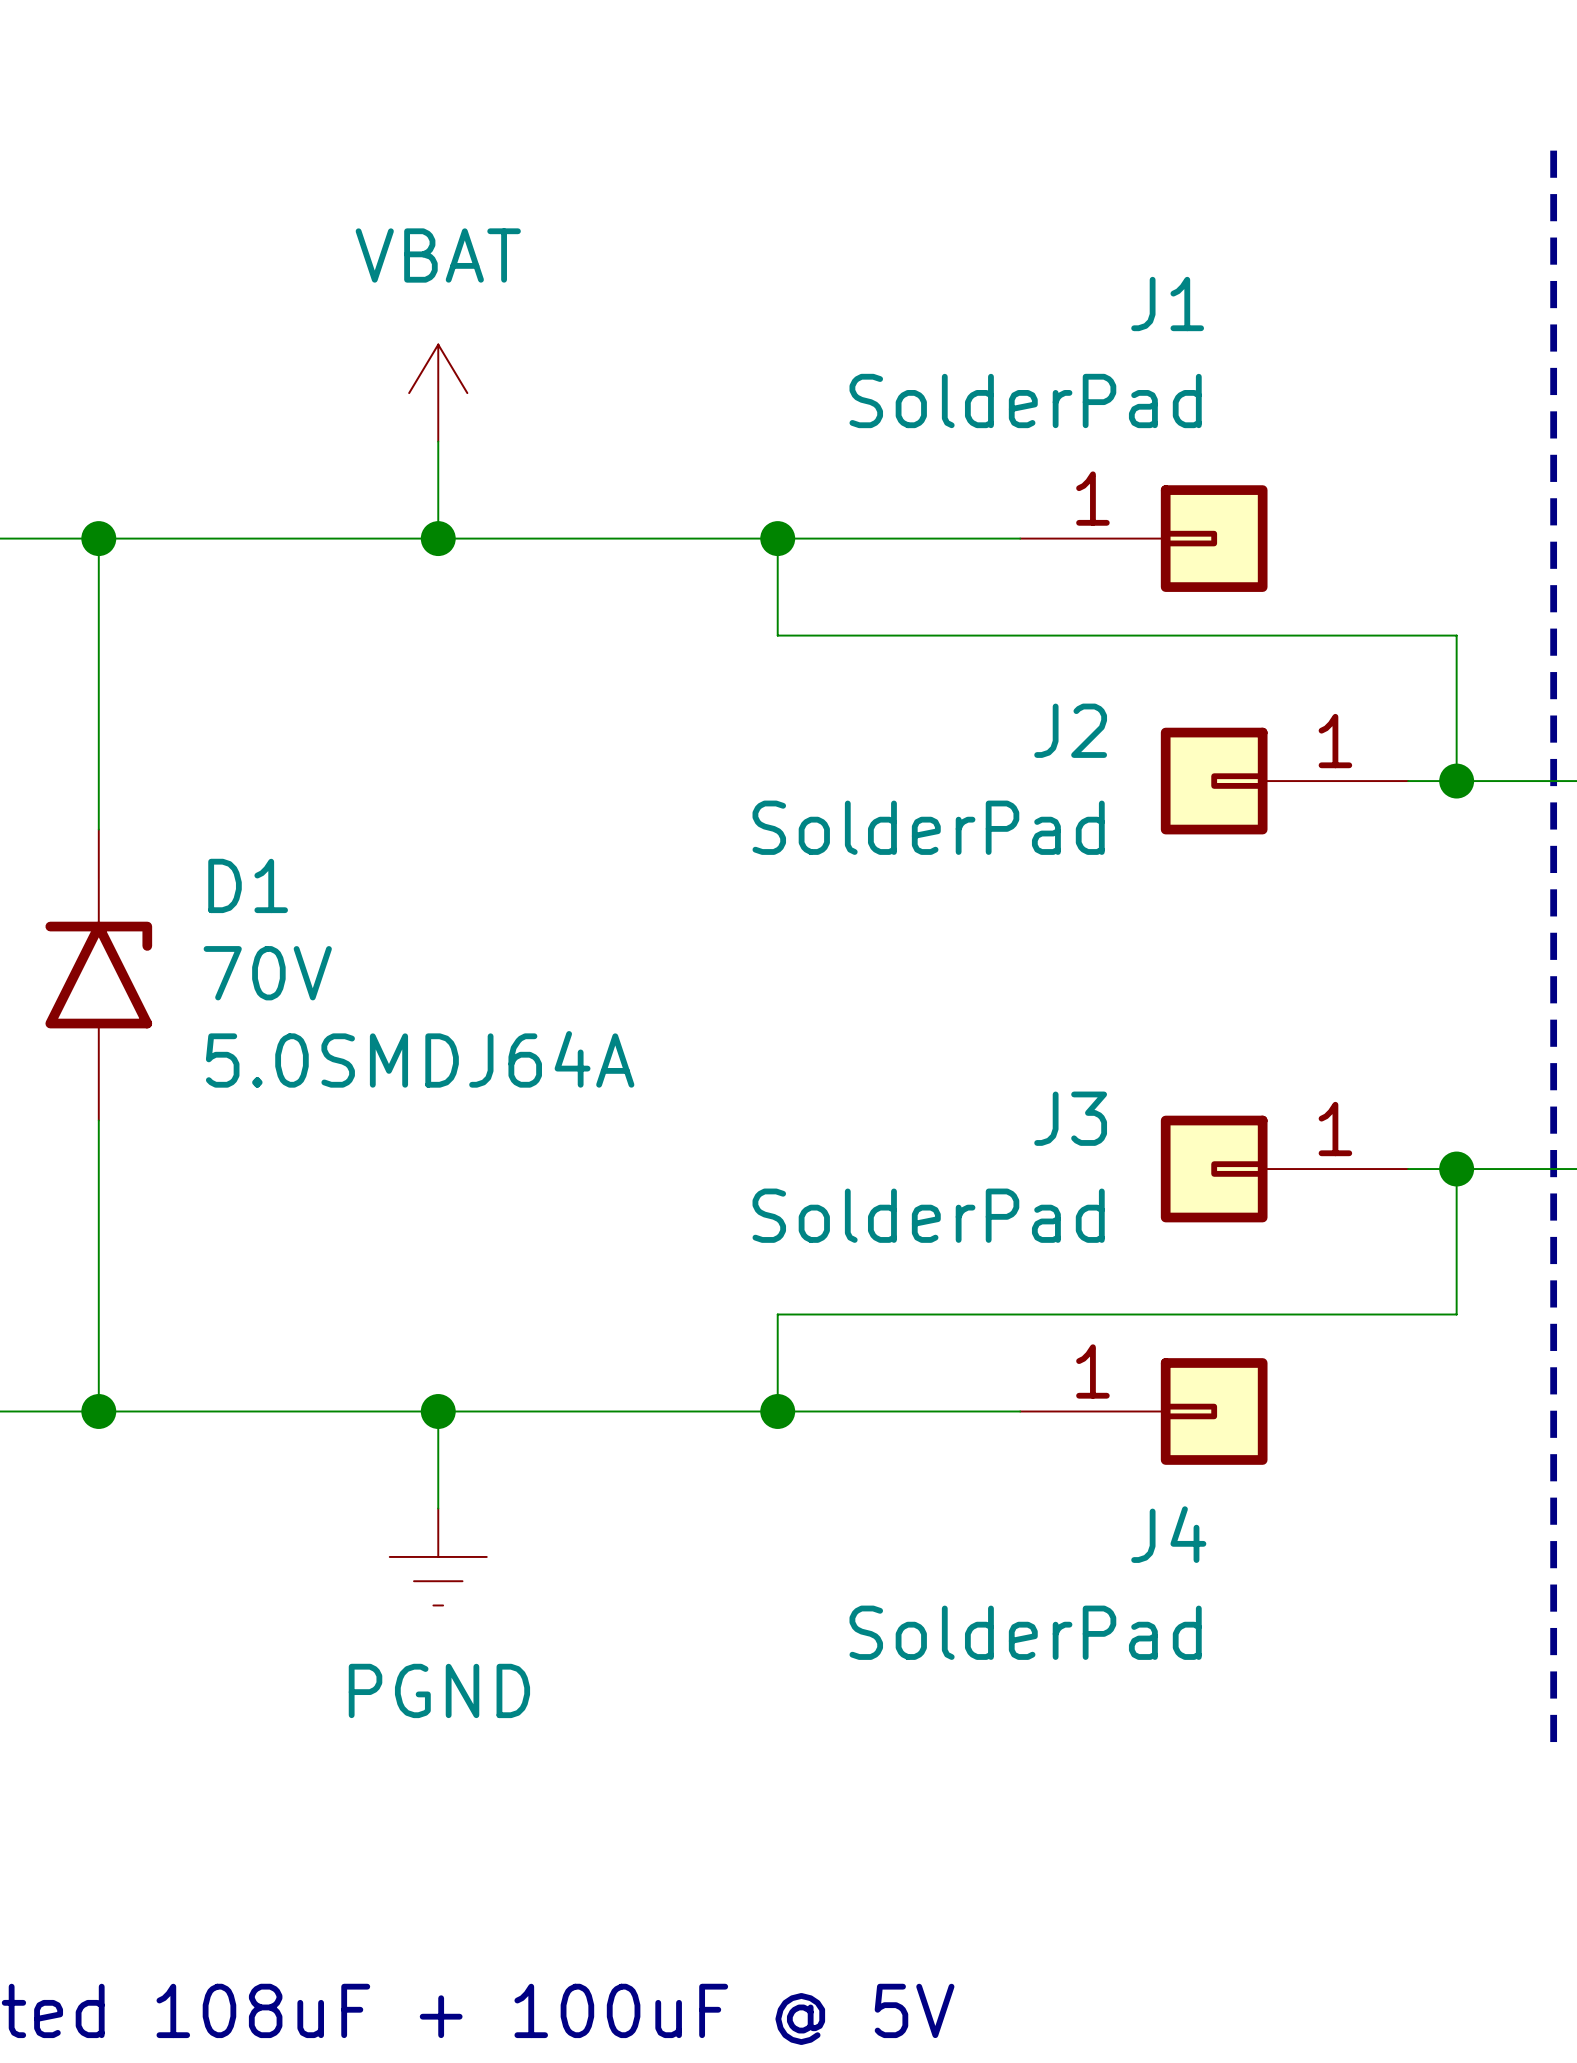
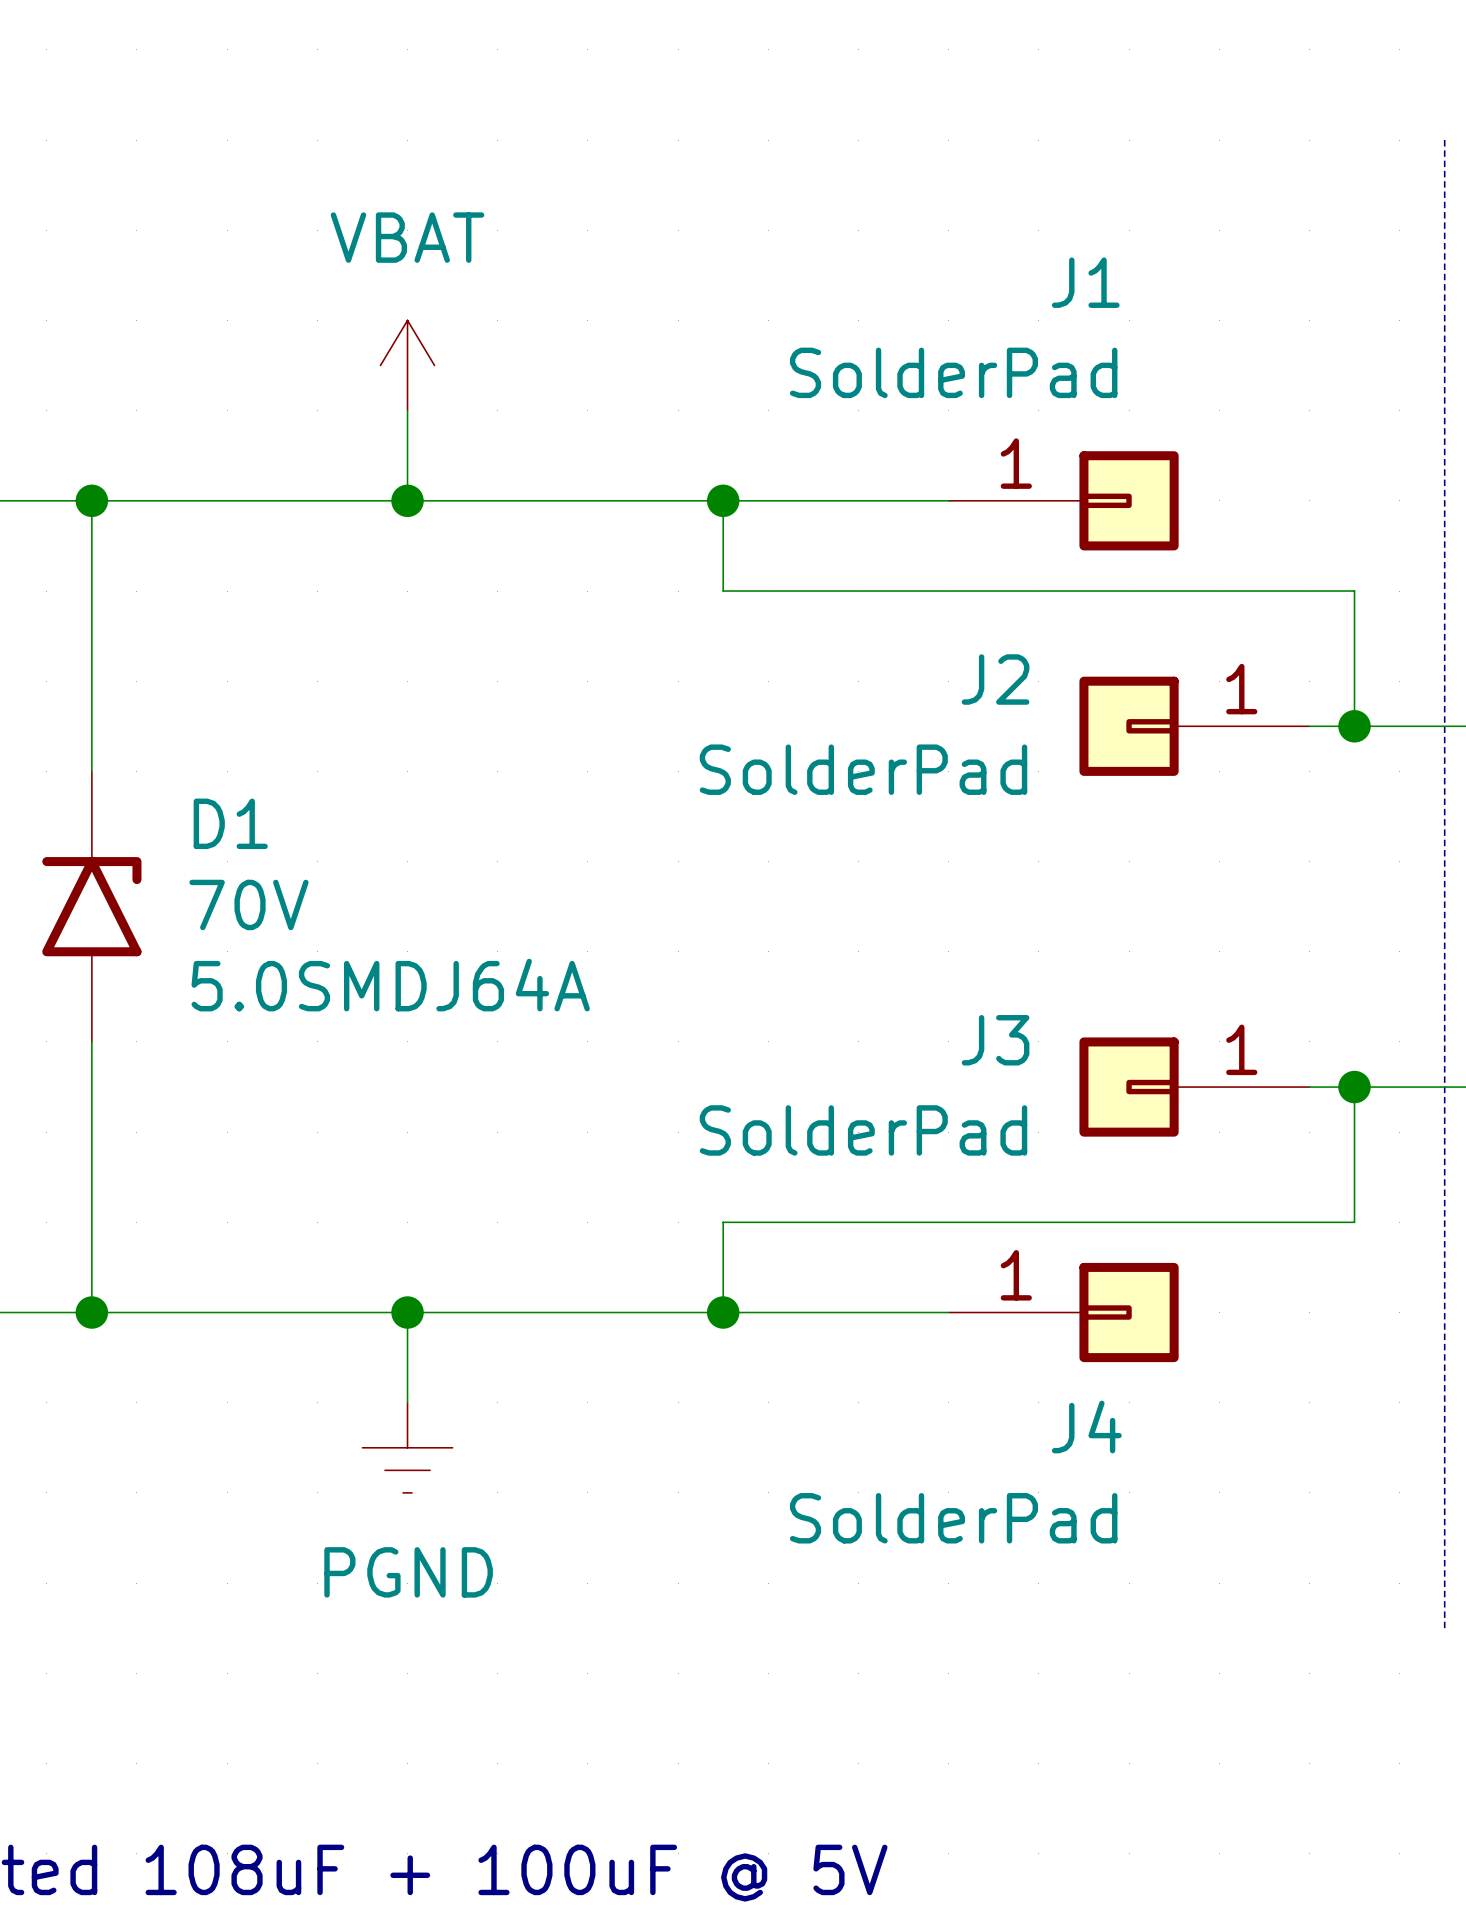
line width: thick (1553, 150) (1553, 1750) -> thin (1444, 140) (1444, 1628)

